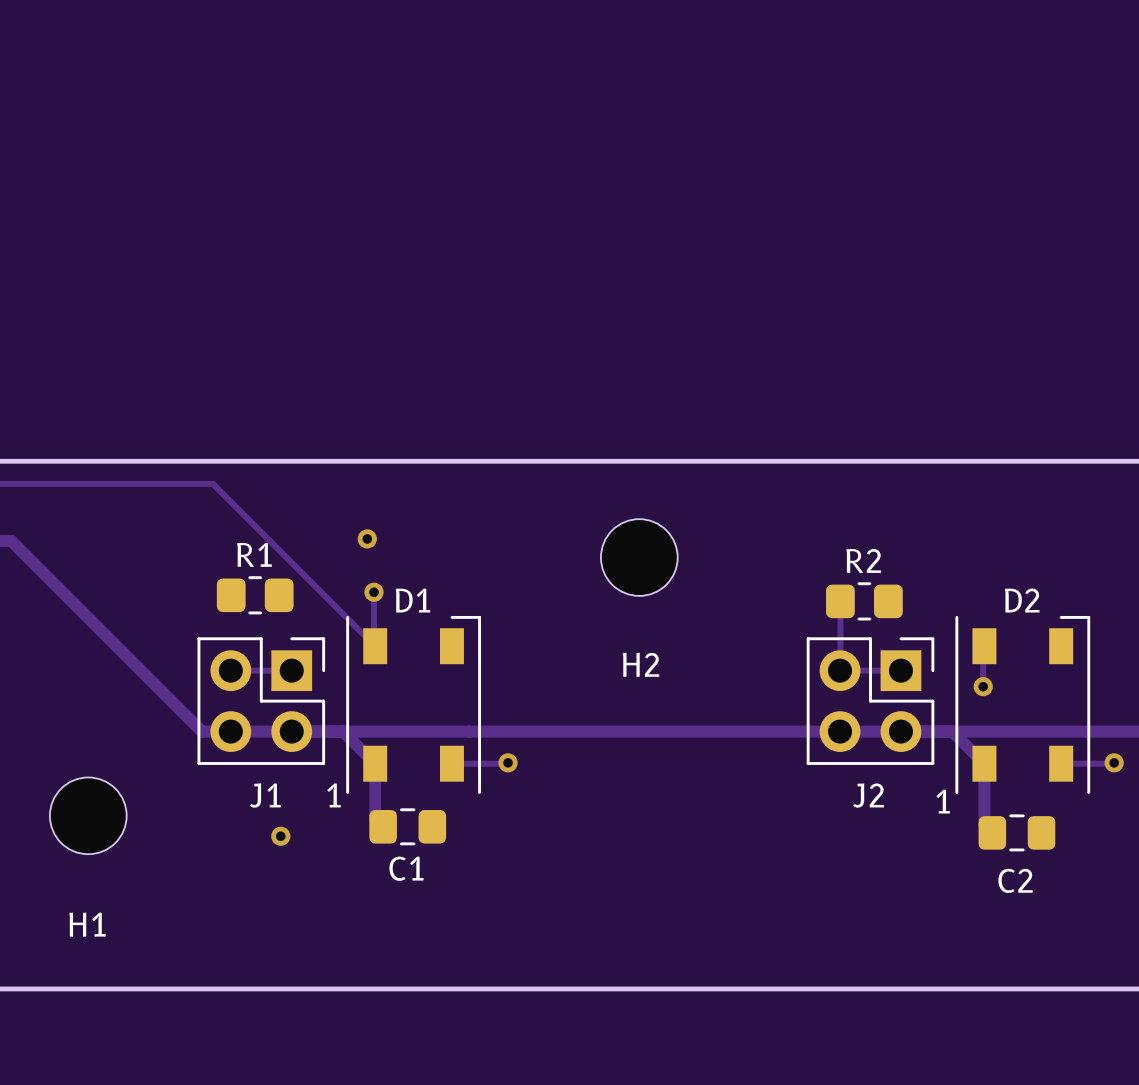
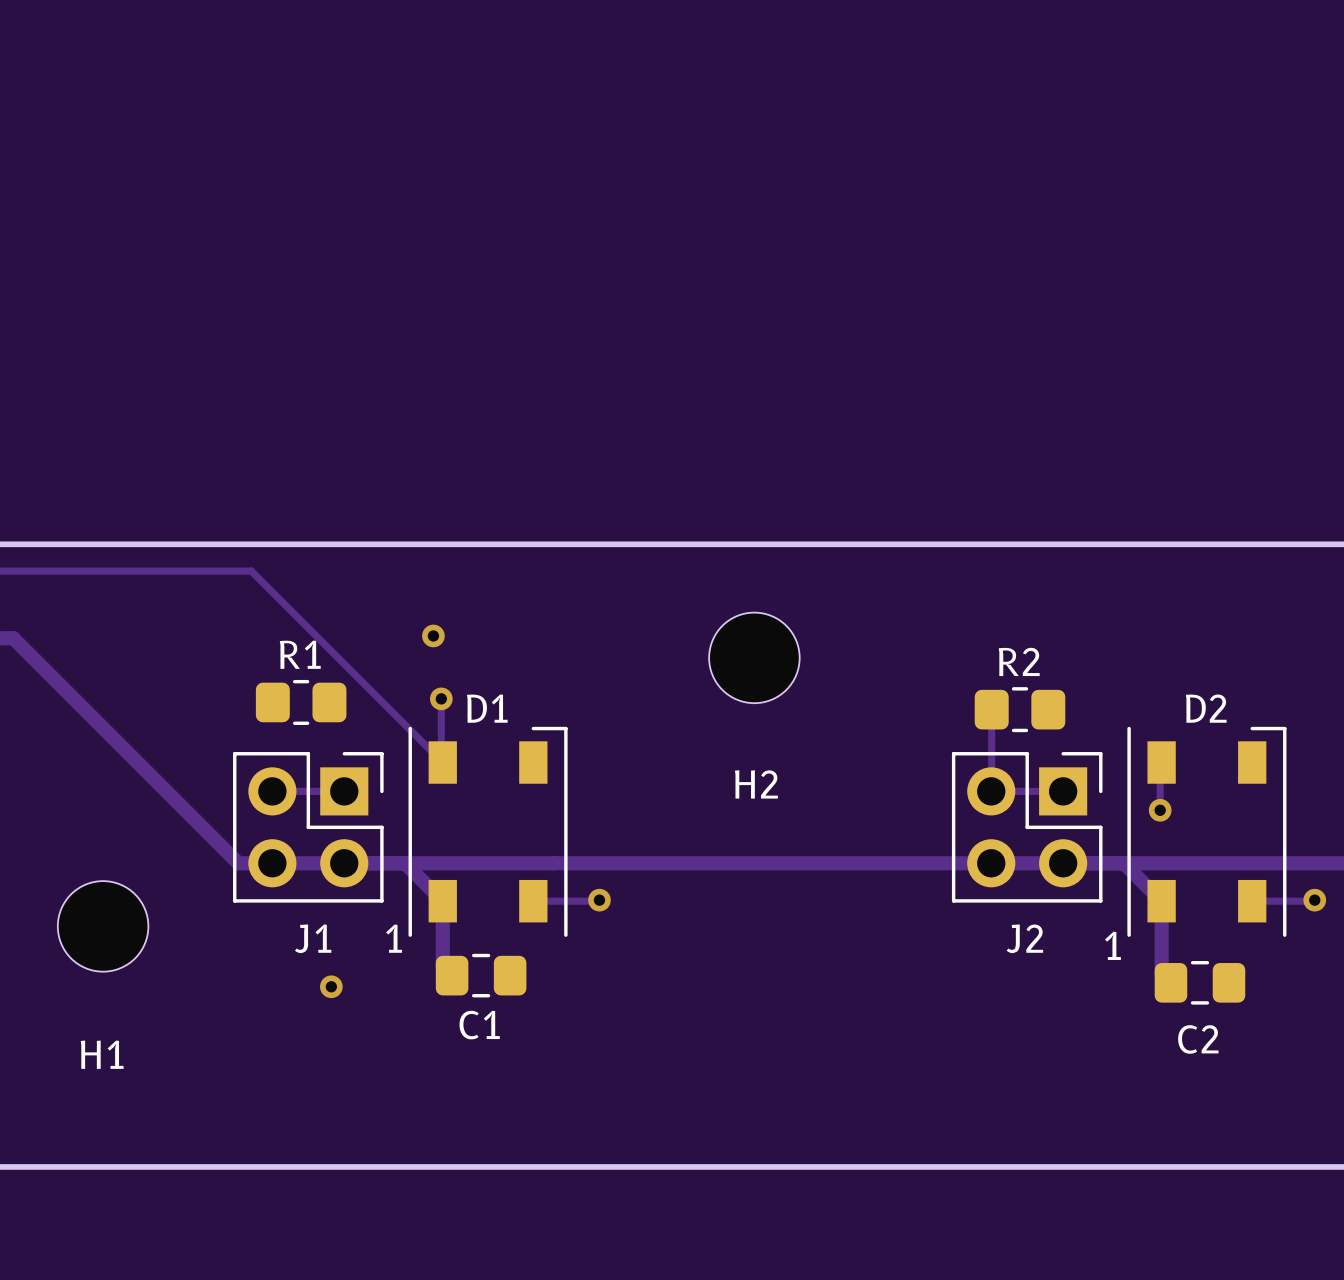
H1 position: (88, 815) -> (103, 926)

